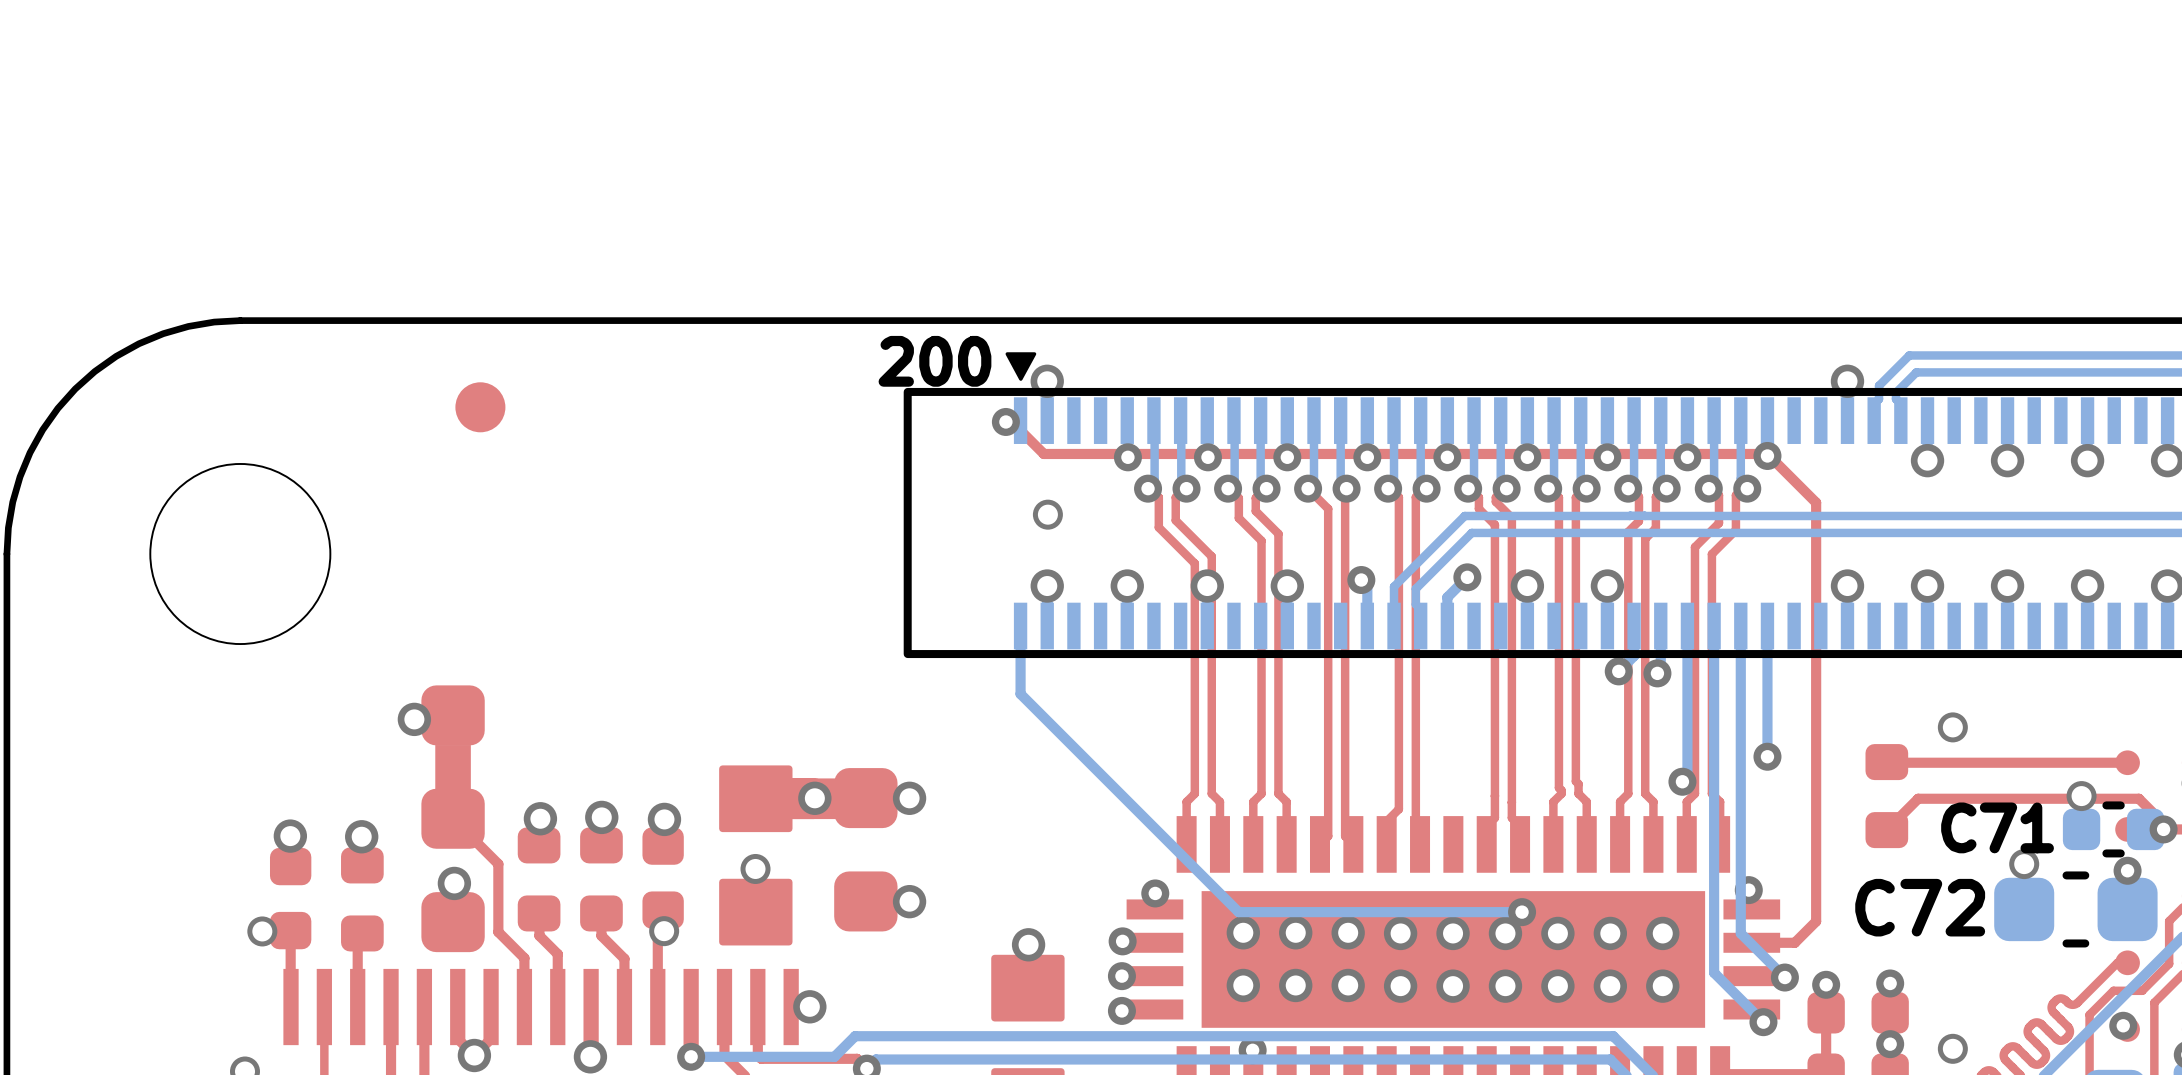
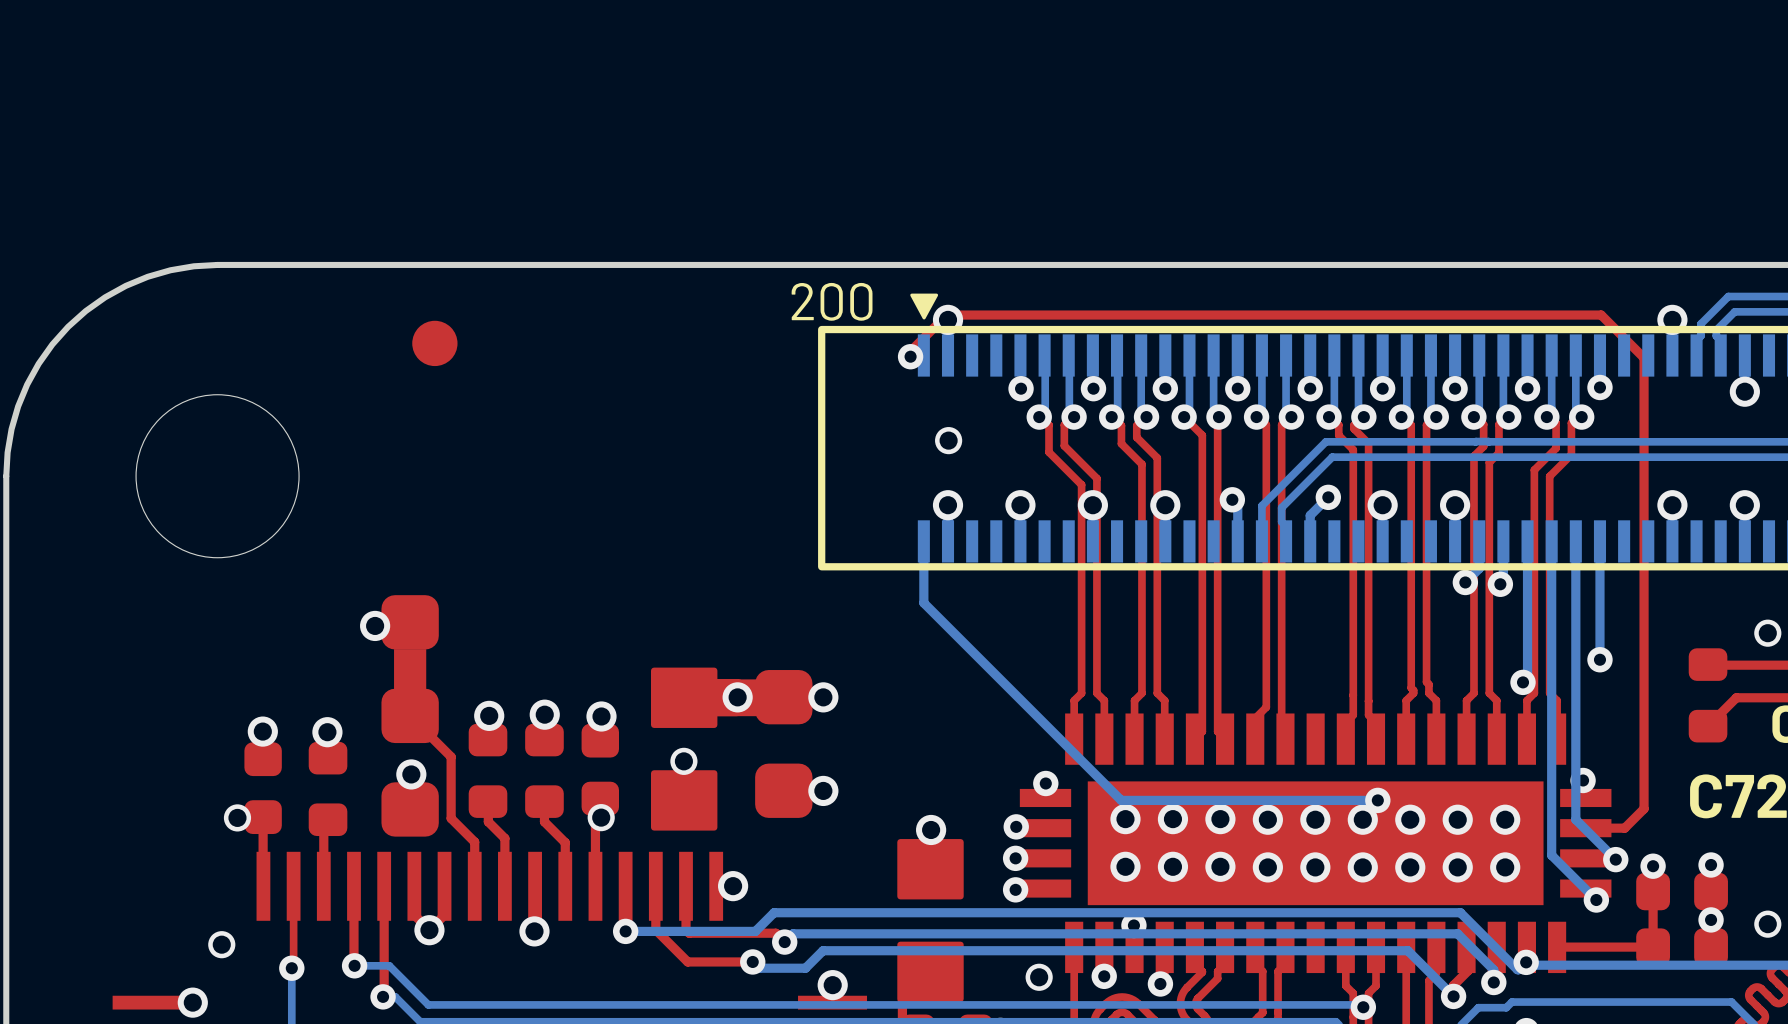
top track: (1005, 415) (1043, 453) (1767, 453) (1816, 502) -> (910, 351) (946, 315) (1601, 315) (1644, 357) (1644, 429)

